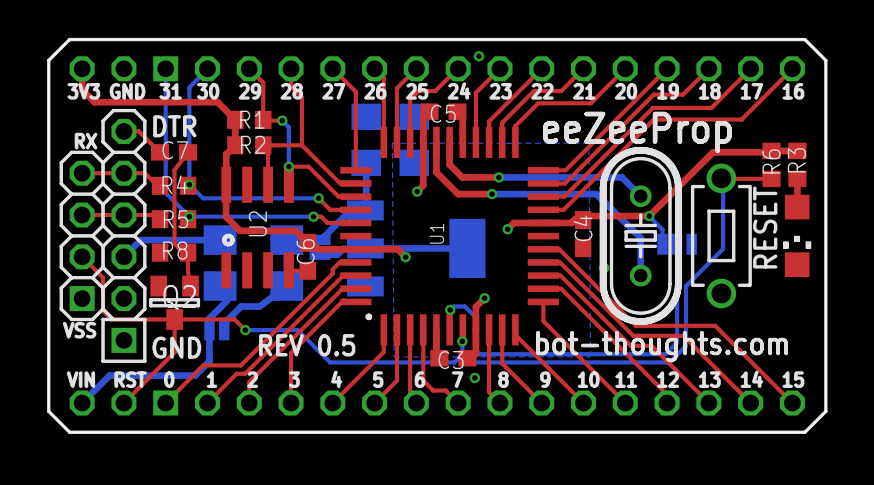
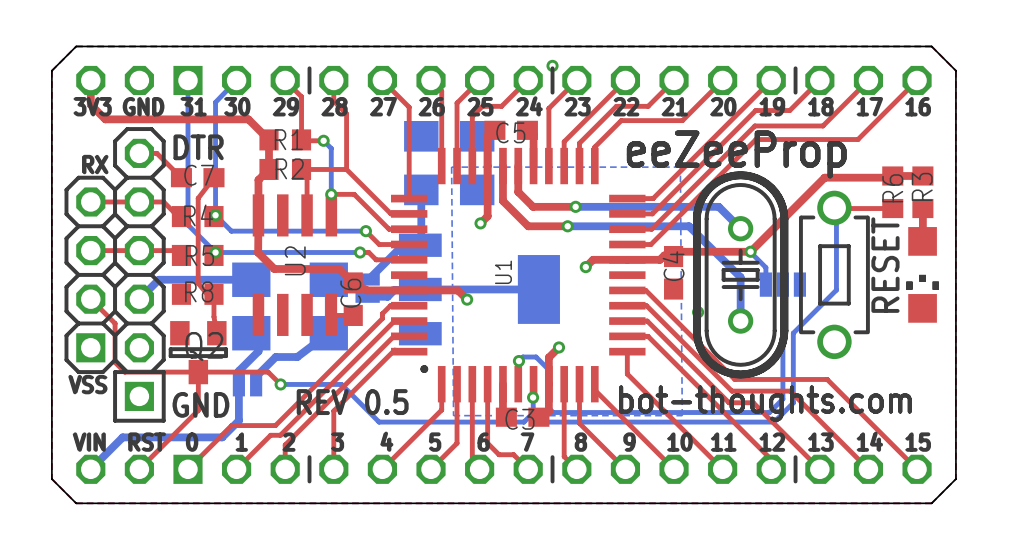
line: (69, 39) (804, 39) (825, 60) (825, 411) (804, 432) (69, 432) (48, 411) (48, 60) (69, 39) -> none
line: none -> (309, 68) (309, 92)
line: none -> (552, 68) (552, 92)
line: none -> (795, 68) (795, 92)
drawing: [222, 233, 235, 247] -> none
via: (474, 377) -> none
line: none -> (309, 457) (309, 481)
line: none -> (552, 457) (552, 481)
line: none -> (795, 457) (795, 481)

